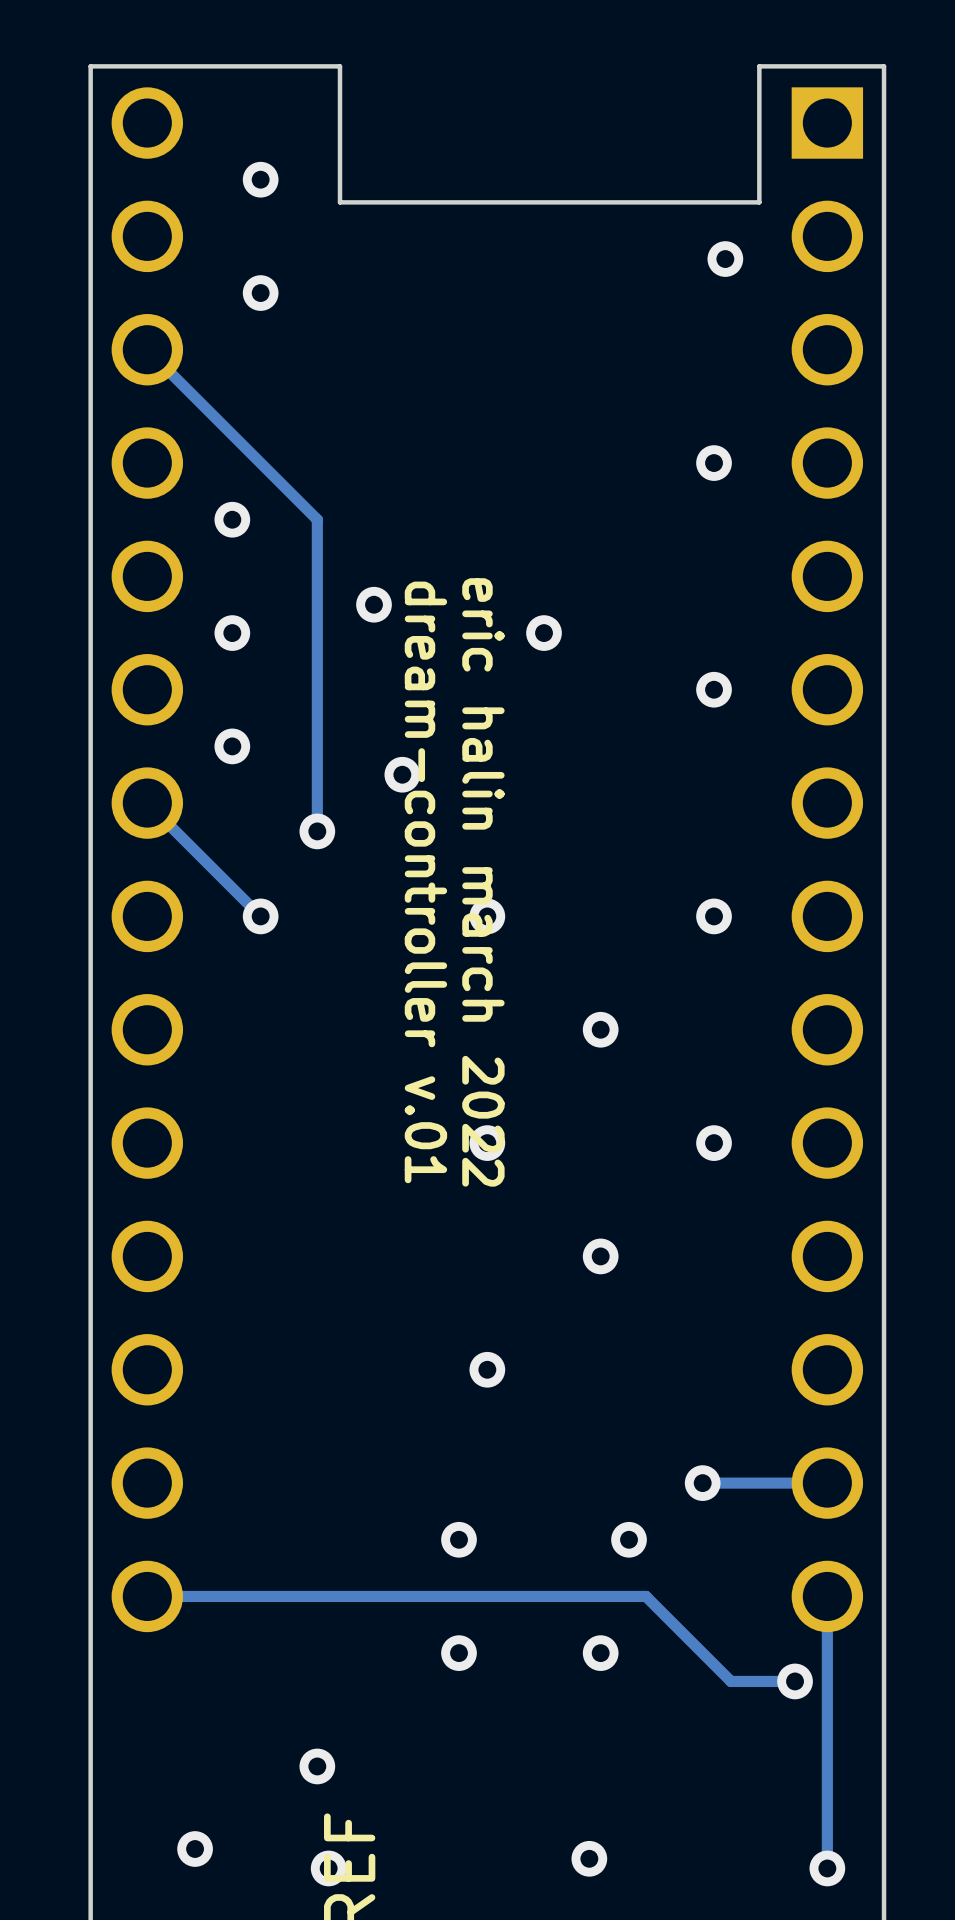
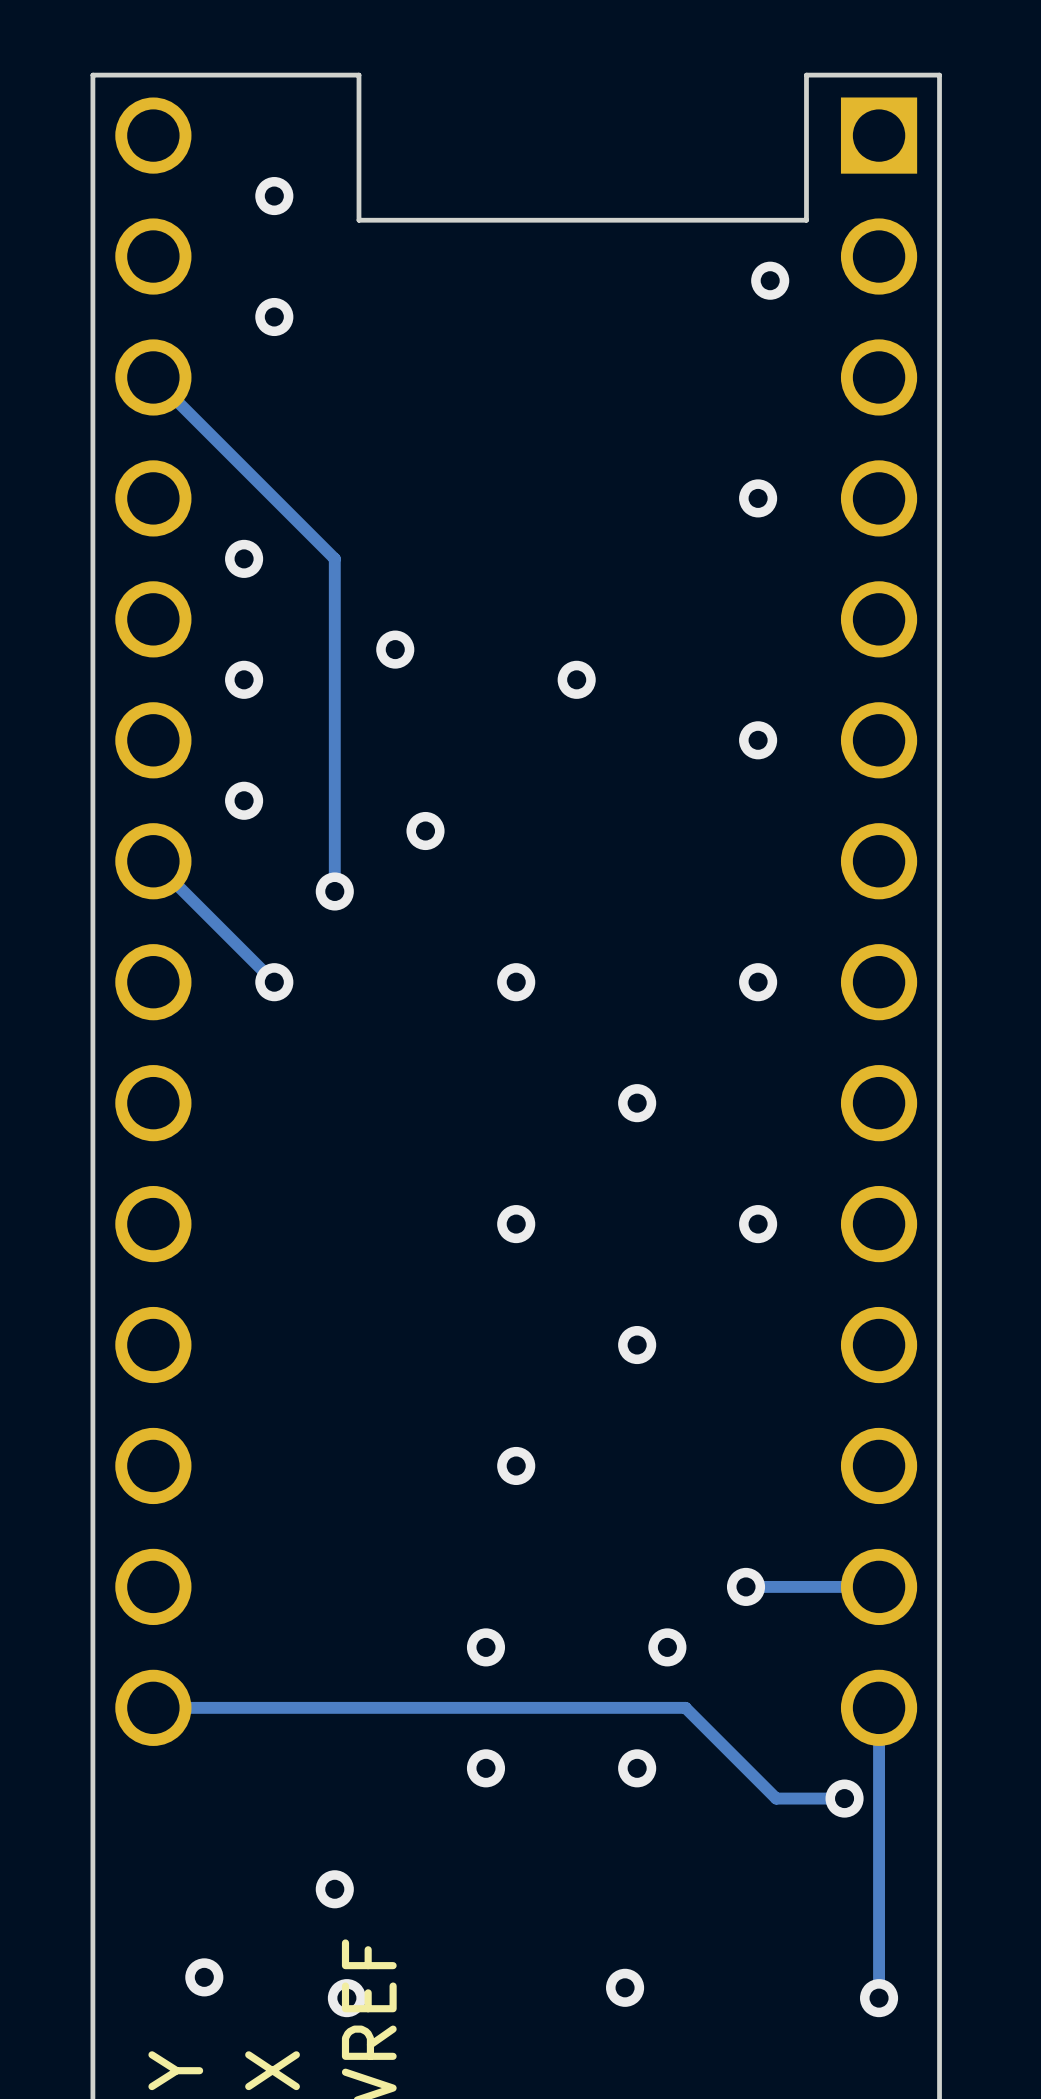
text: dream-controller v.01 (425, 882) -> none
text: eric halin march 2022 (483, 882) -> none

